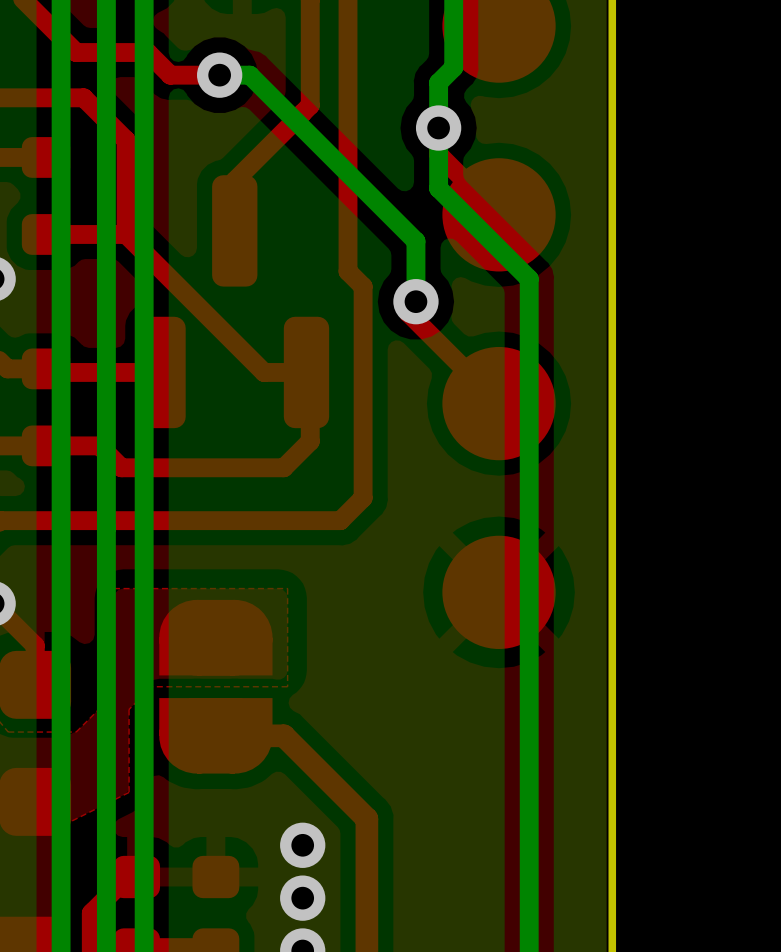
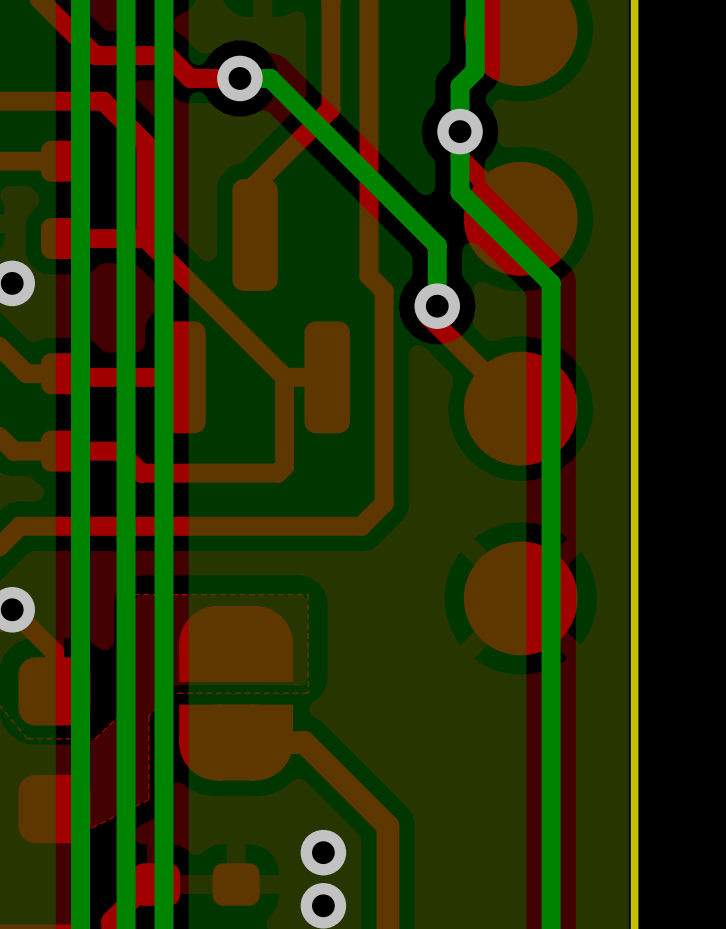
top track: (310, 376) (310, 441) (283, 467) (257, 467) -> (284, 377) (284, 466) (277, 473)

